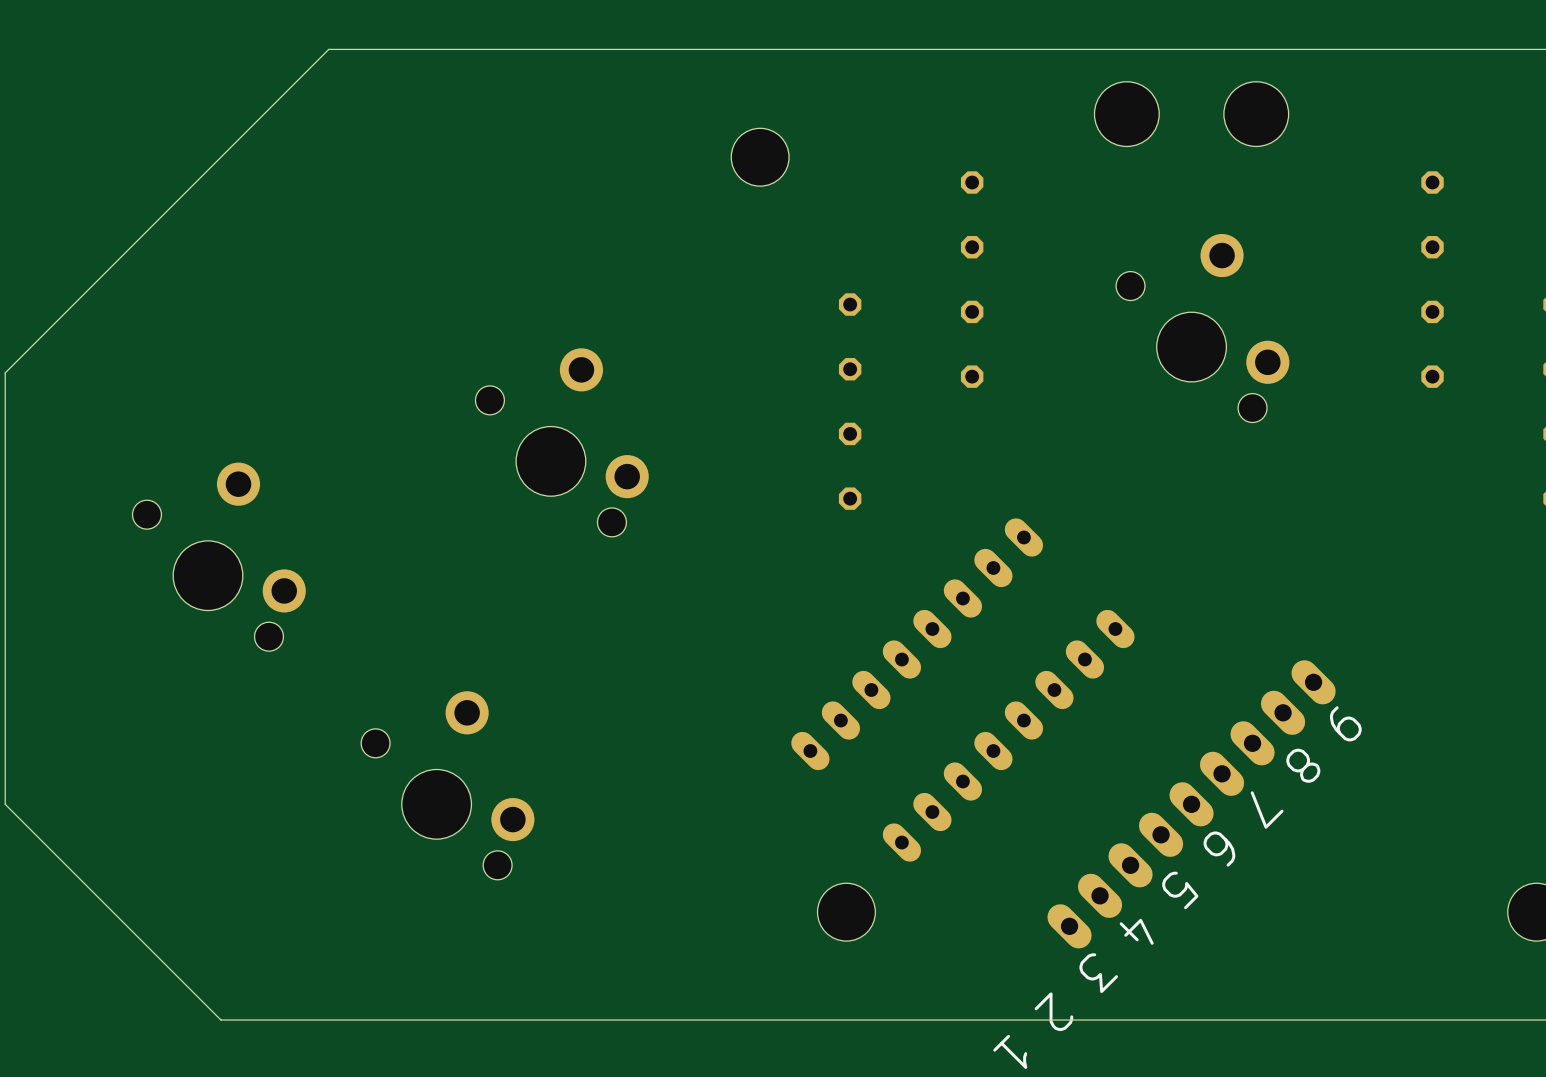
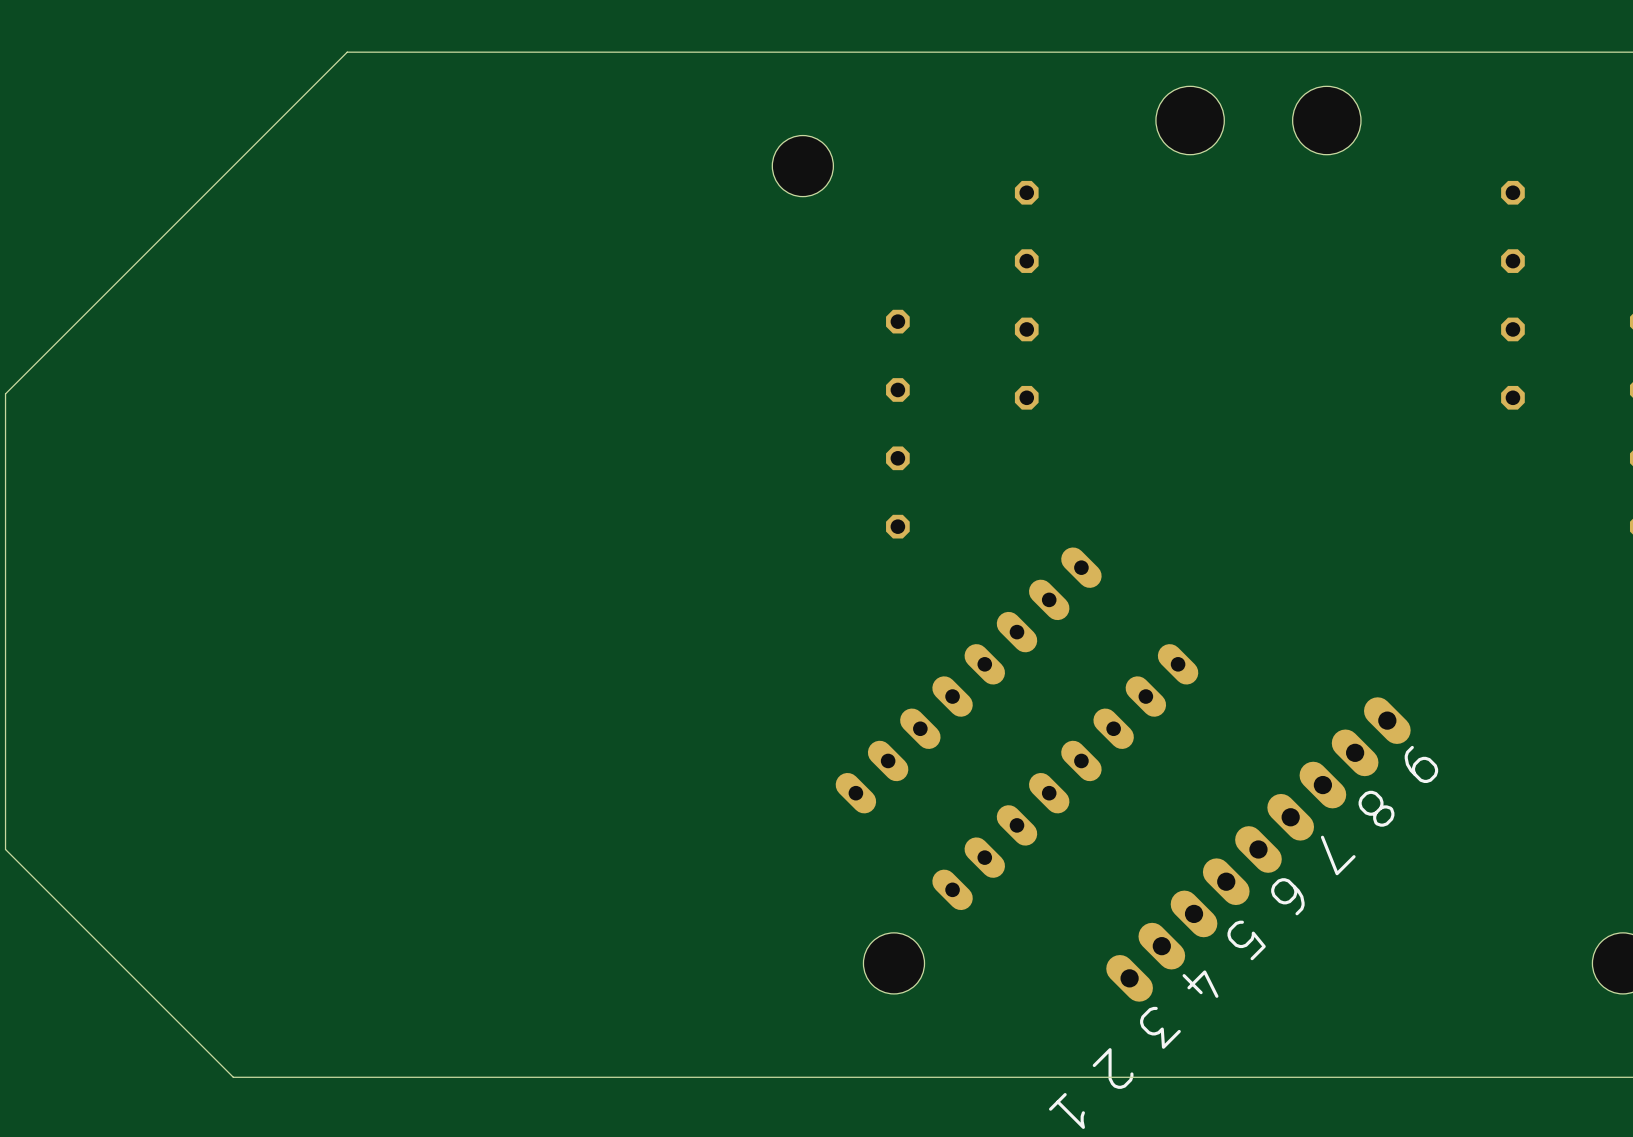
part: (1202, 328) -> none
part: (562, 442) -> none
part: (219, 556) -> none
part: (447, 785) -> none

